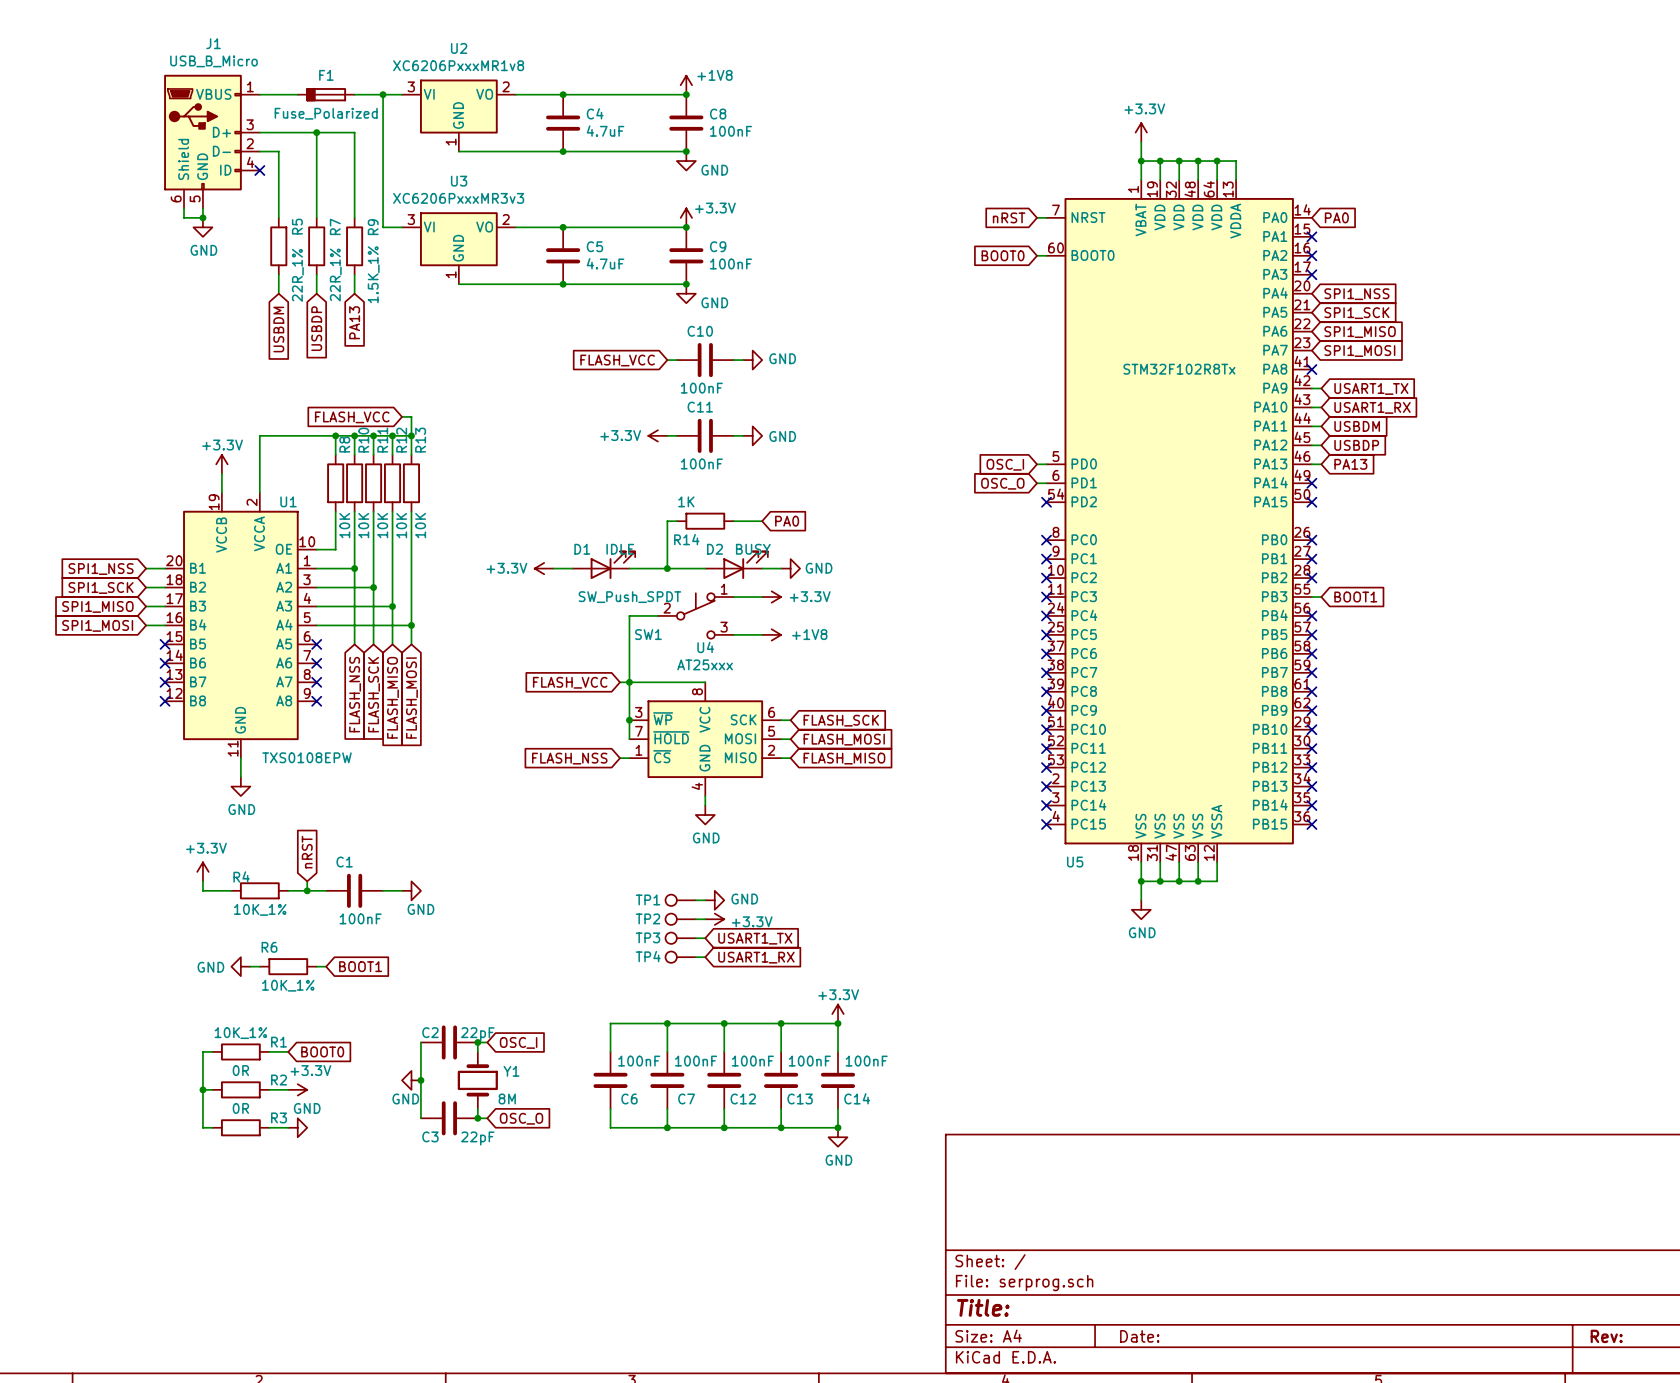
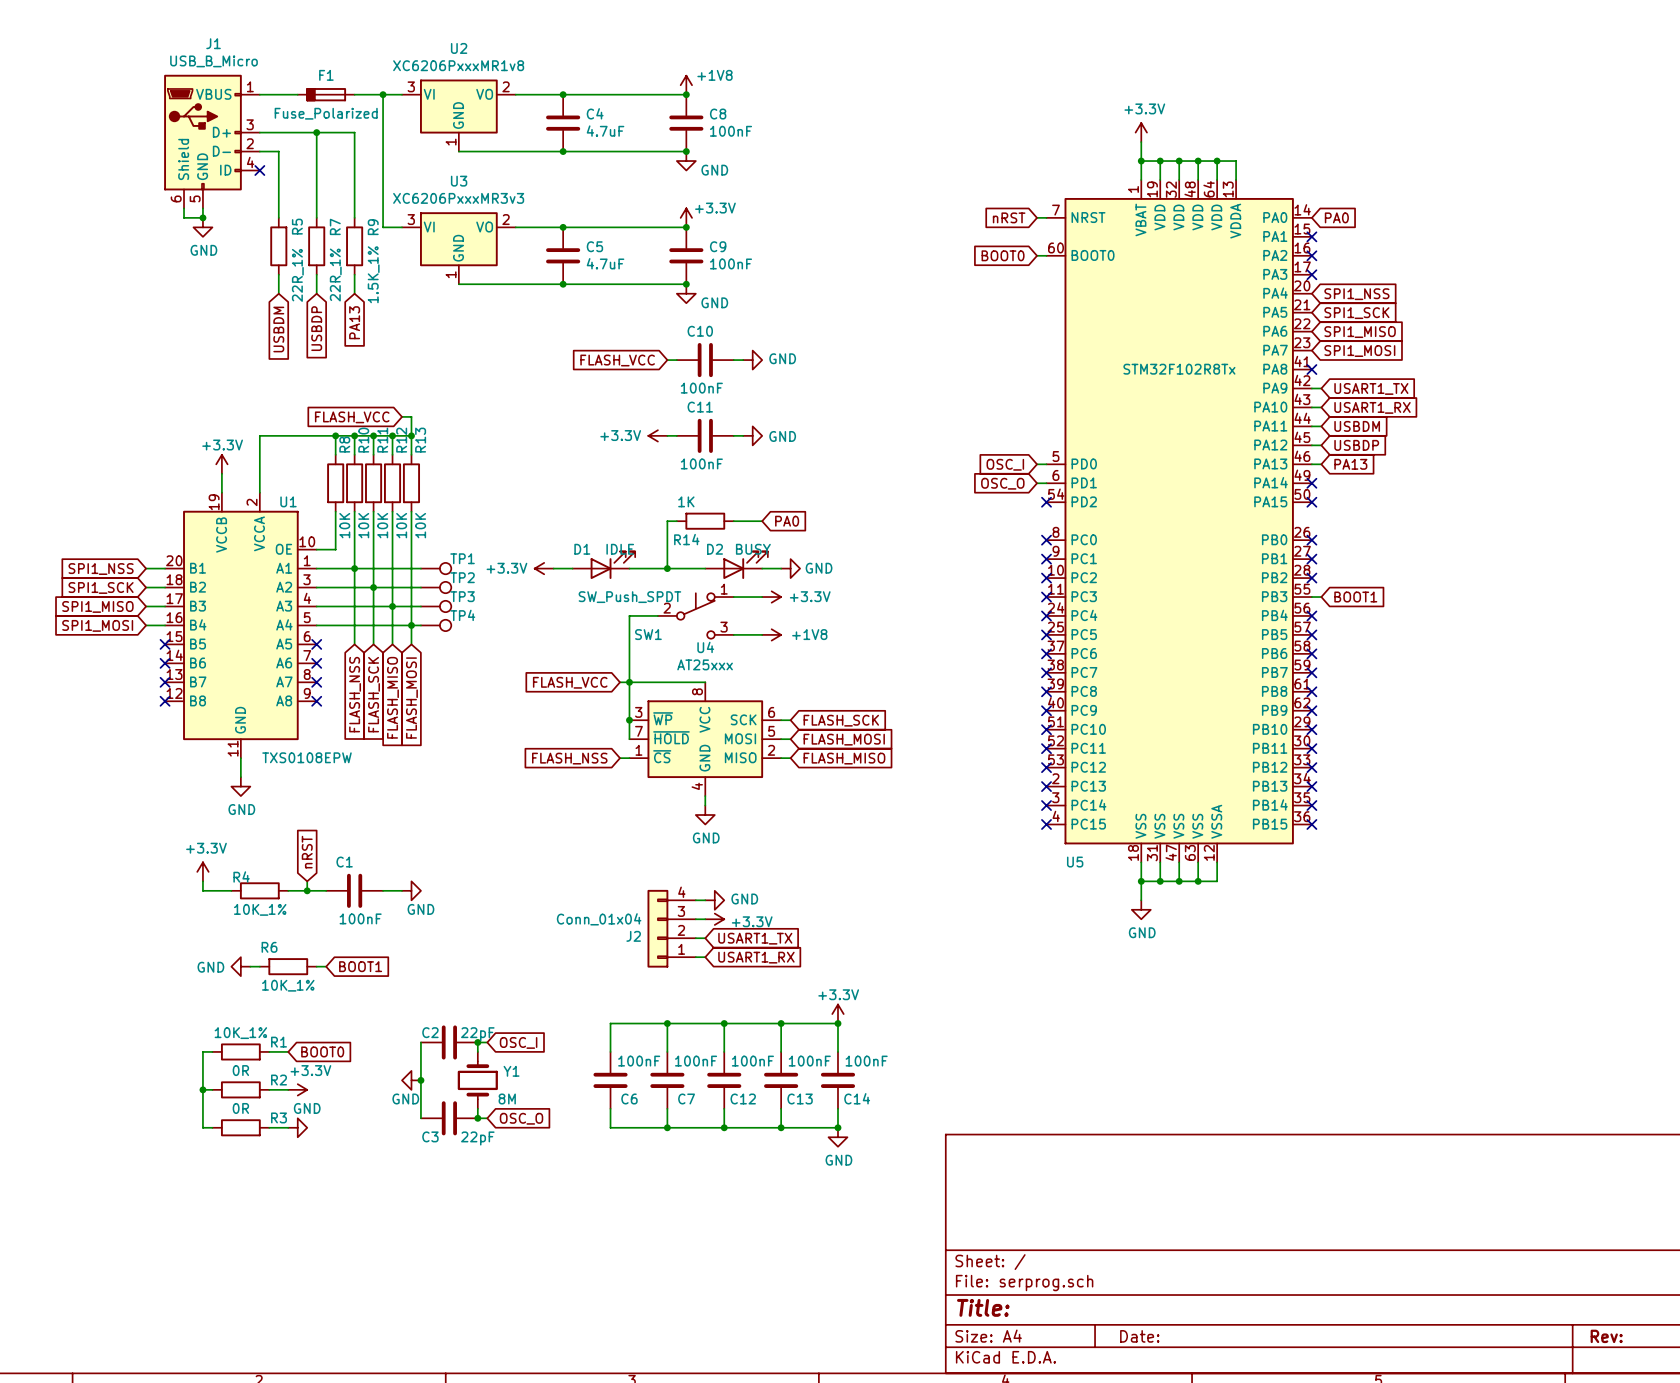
wire: none -> (354, 568) (420, 568)
wire: none -> (373, 587) (420, 587)
wire: none -> (392, 606) (420, 606)
wire: none -> (411, 625) (420, 625)
TP1 rotation: 0° (671, 900) -> 180° (445, 568)
TP1 position: (680, 900) -> (436, 568)
TP2 rotation: 0° (671, 919) -> 180° (445, 587)
TP2 position: (680, 919) -> (436, 587)
J2: none -> Conn_01x04 (671, 928)
TP3 rotation: 0° (671, 938) -> 180° (445, 606)
TP3 position: (680, 938) -> (436, 606)
TP4 rotation: 0° (671, 957) -> 180° (445, 625)
TP4 position: (680, 957) -> (436, 625)

